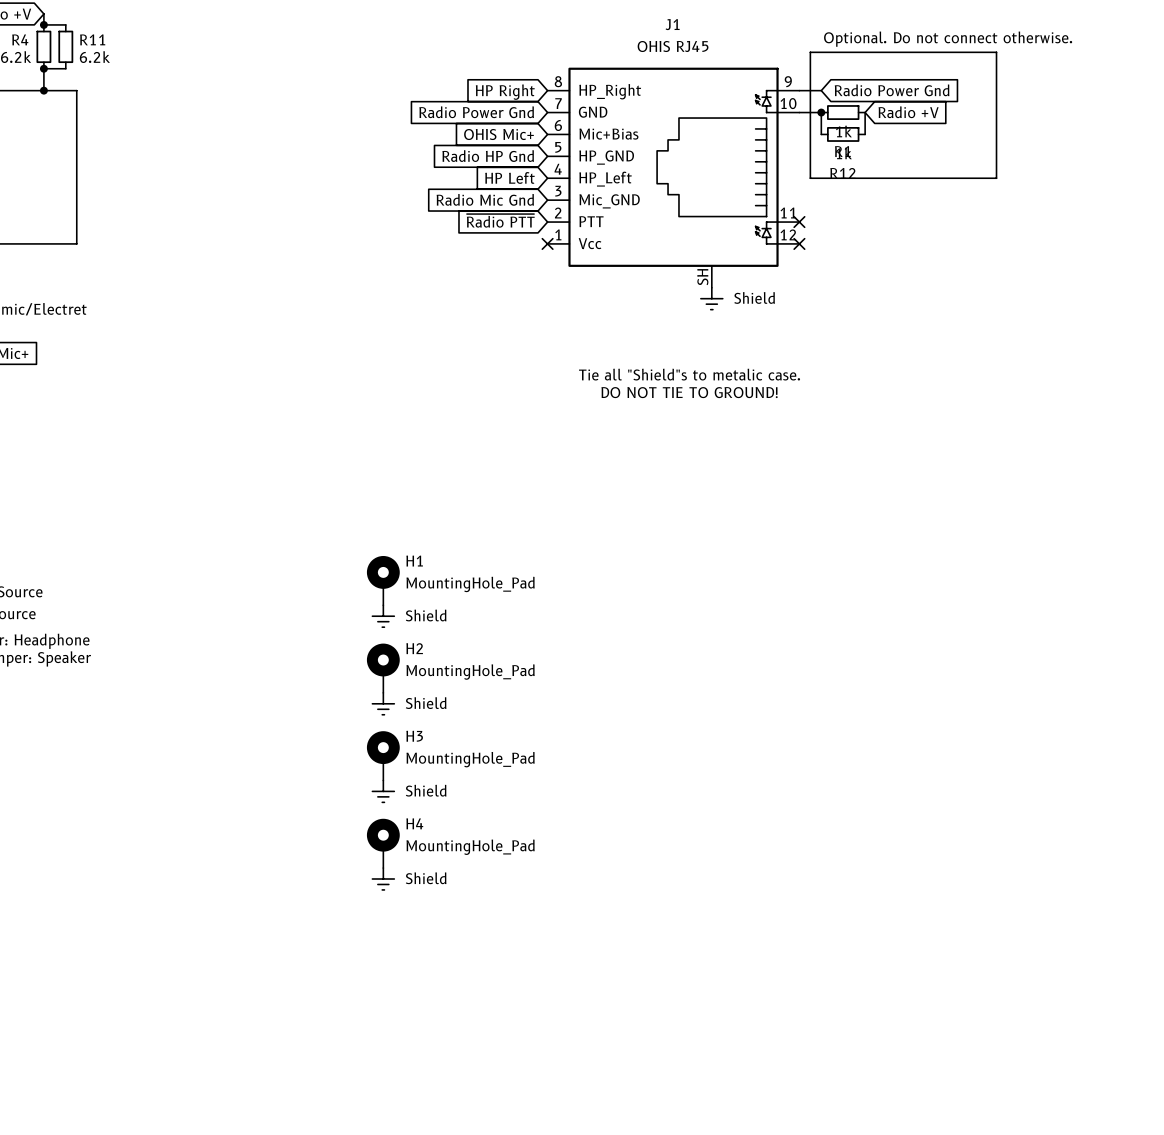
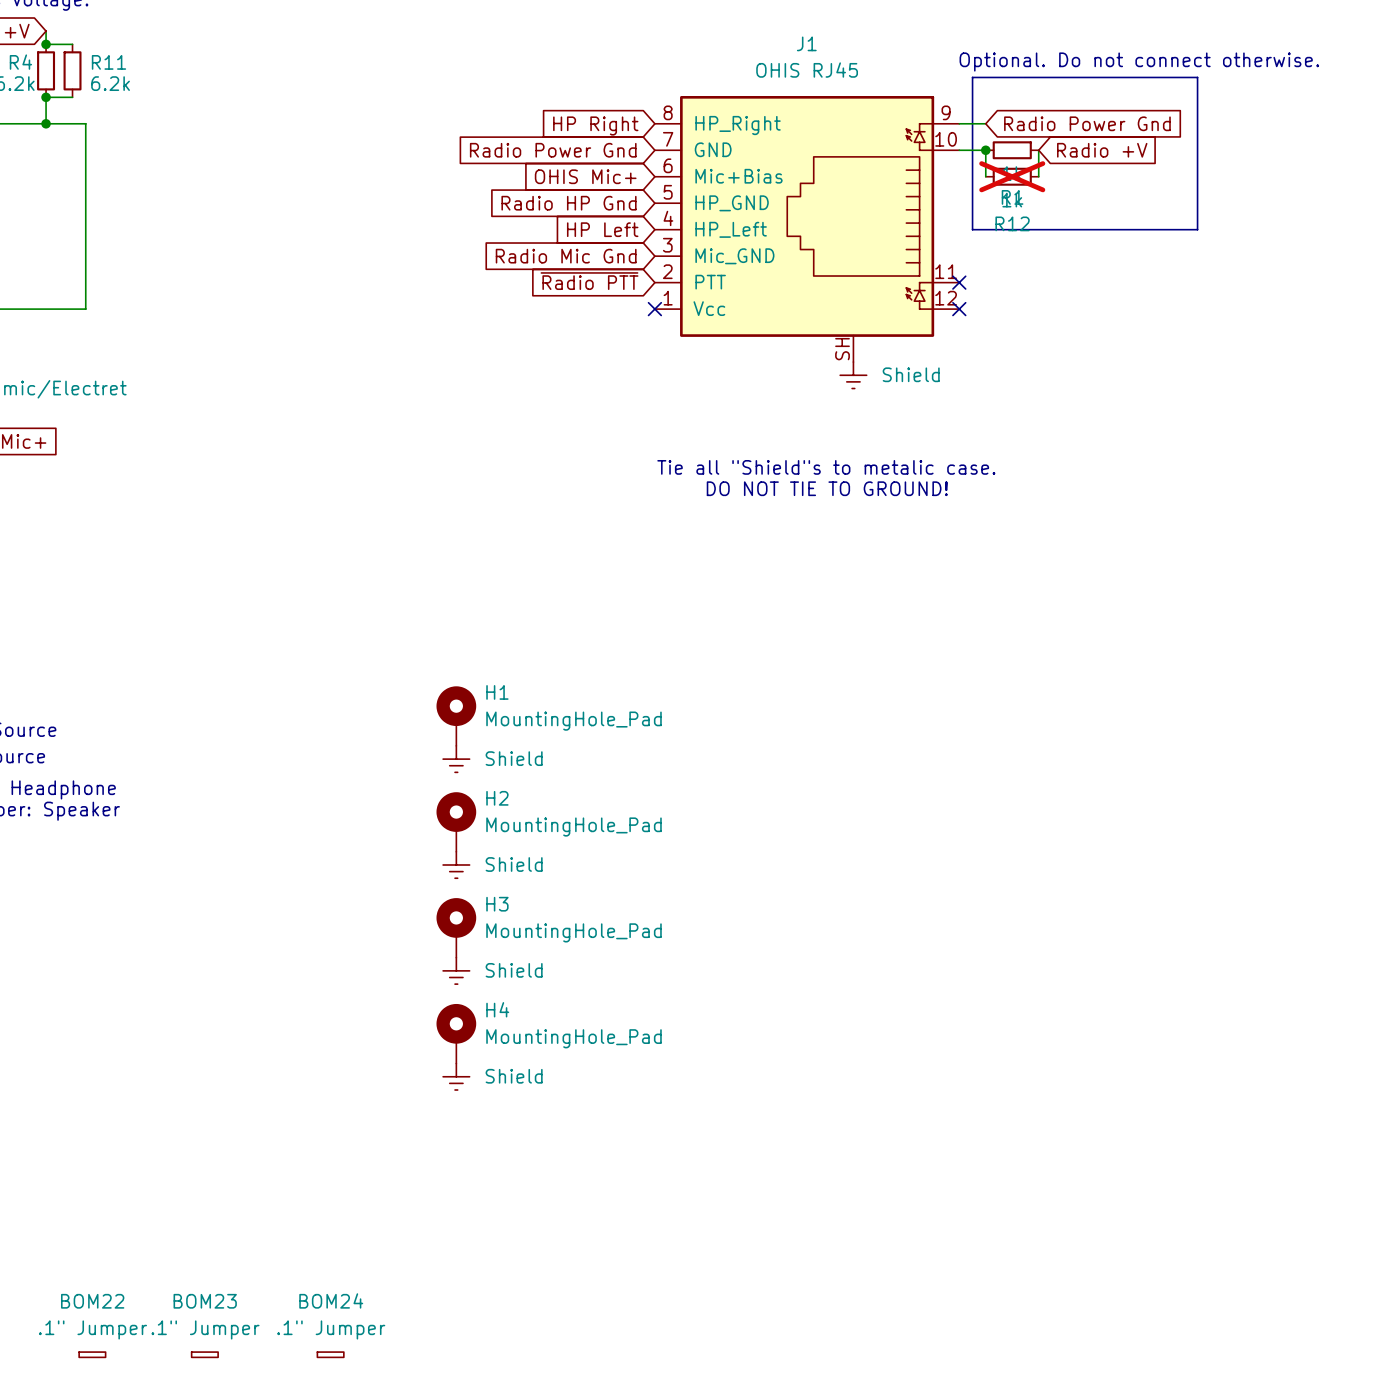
R12 do-not-place cross: none -> (1012, 176)
BOM22: none -> .1" Jumper (92, 1354)
BOM23: none -> .1" Jumper (204, 1354)
BOM24: none -> .1" Jumper (330, 1354)

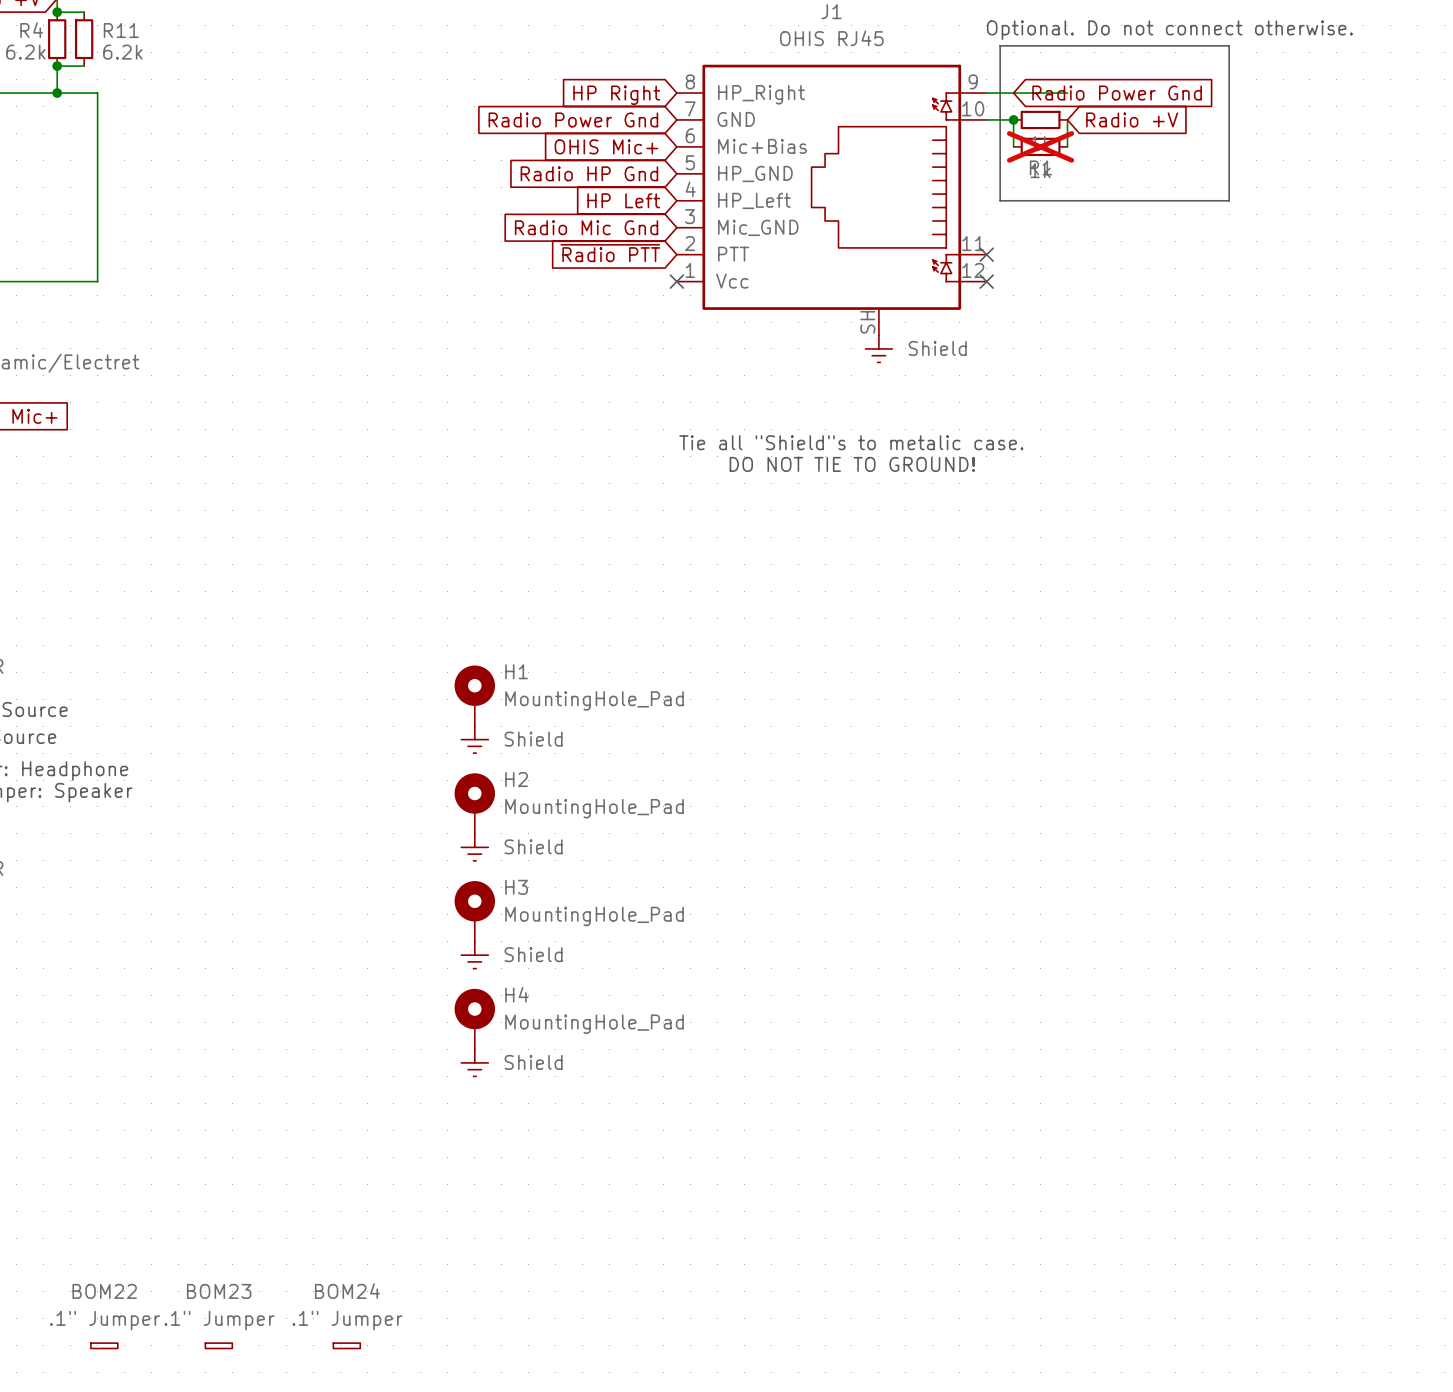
wire: none -> (1013, 93) (1067, 93)
R12 name: R12 (1012, 223) -> none

